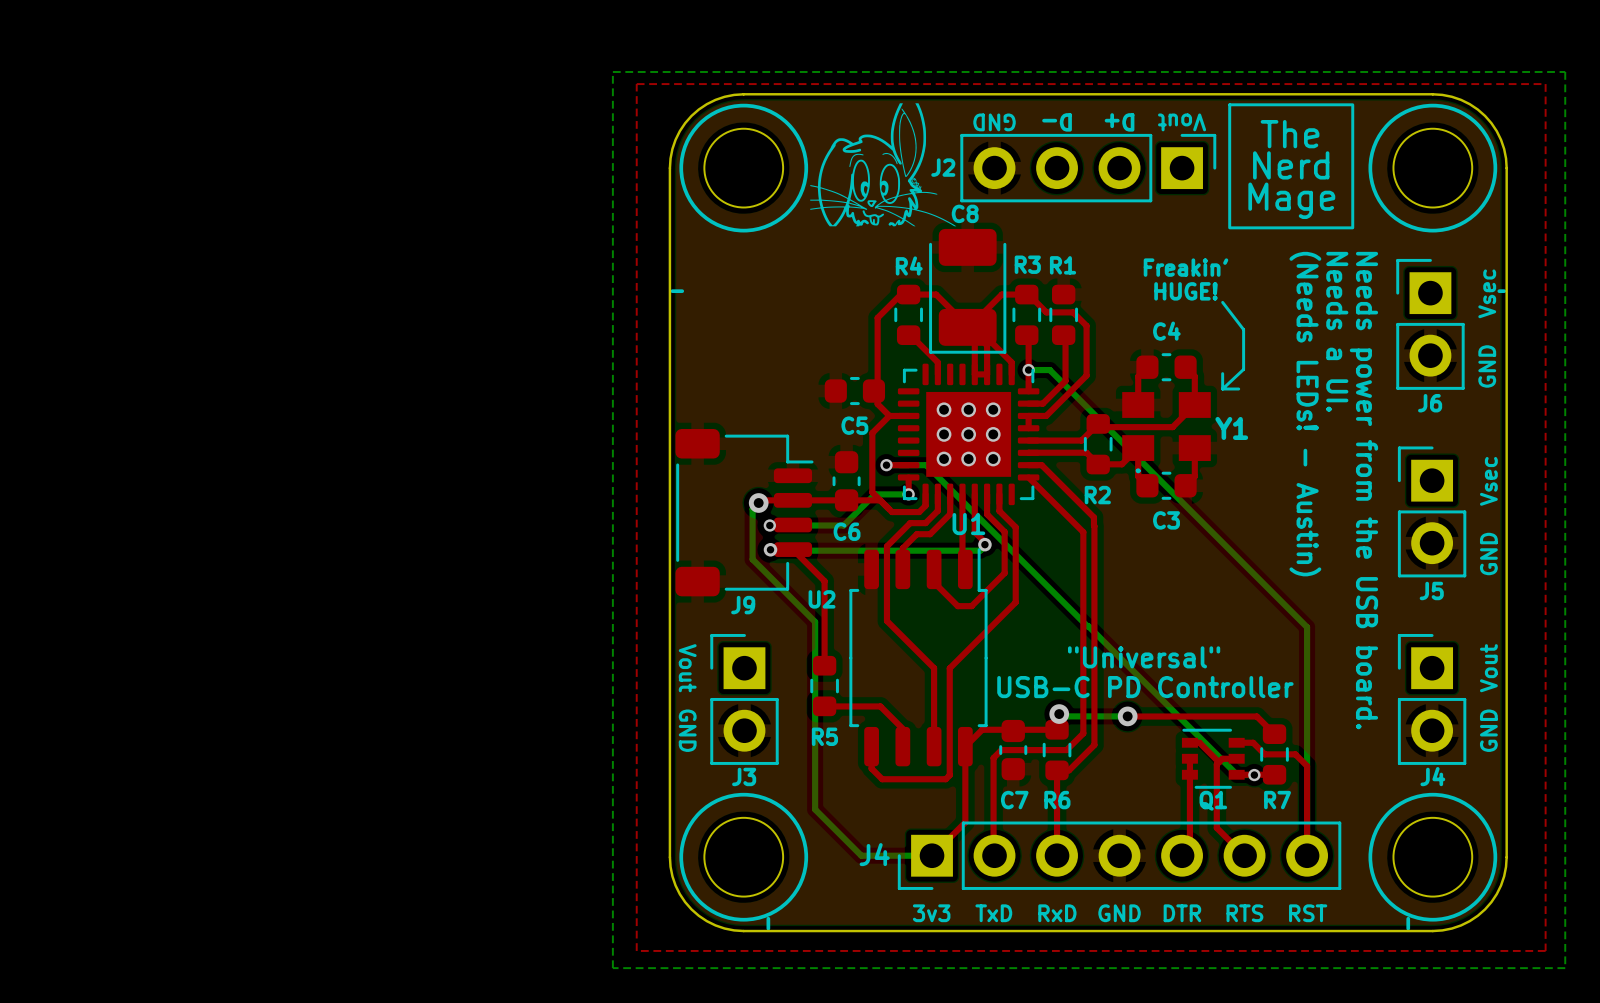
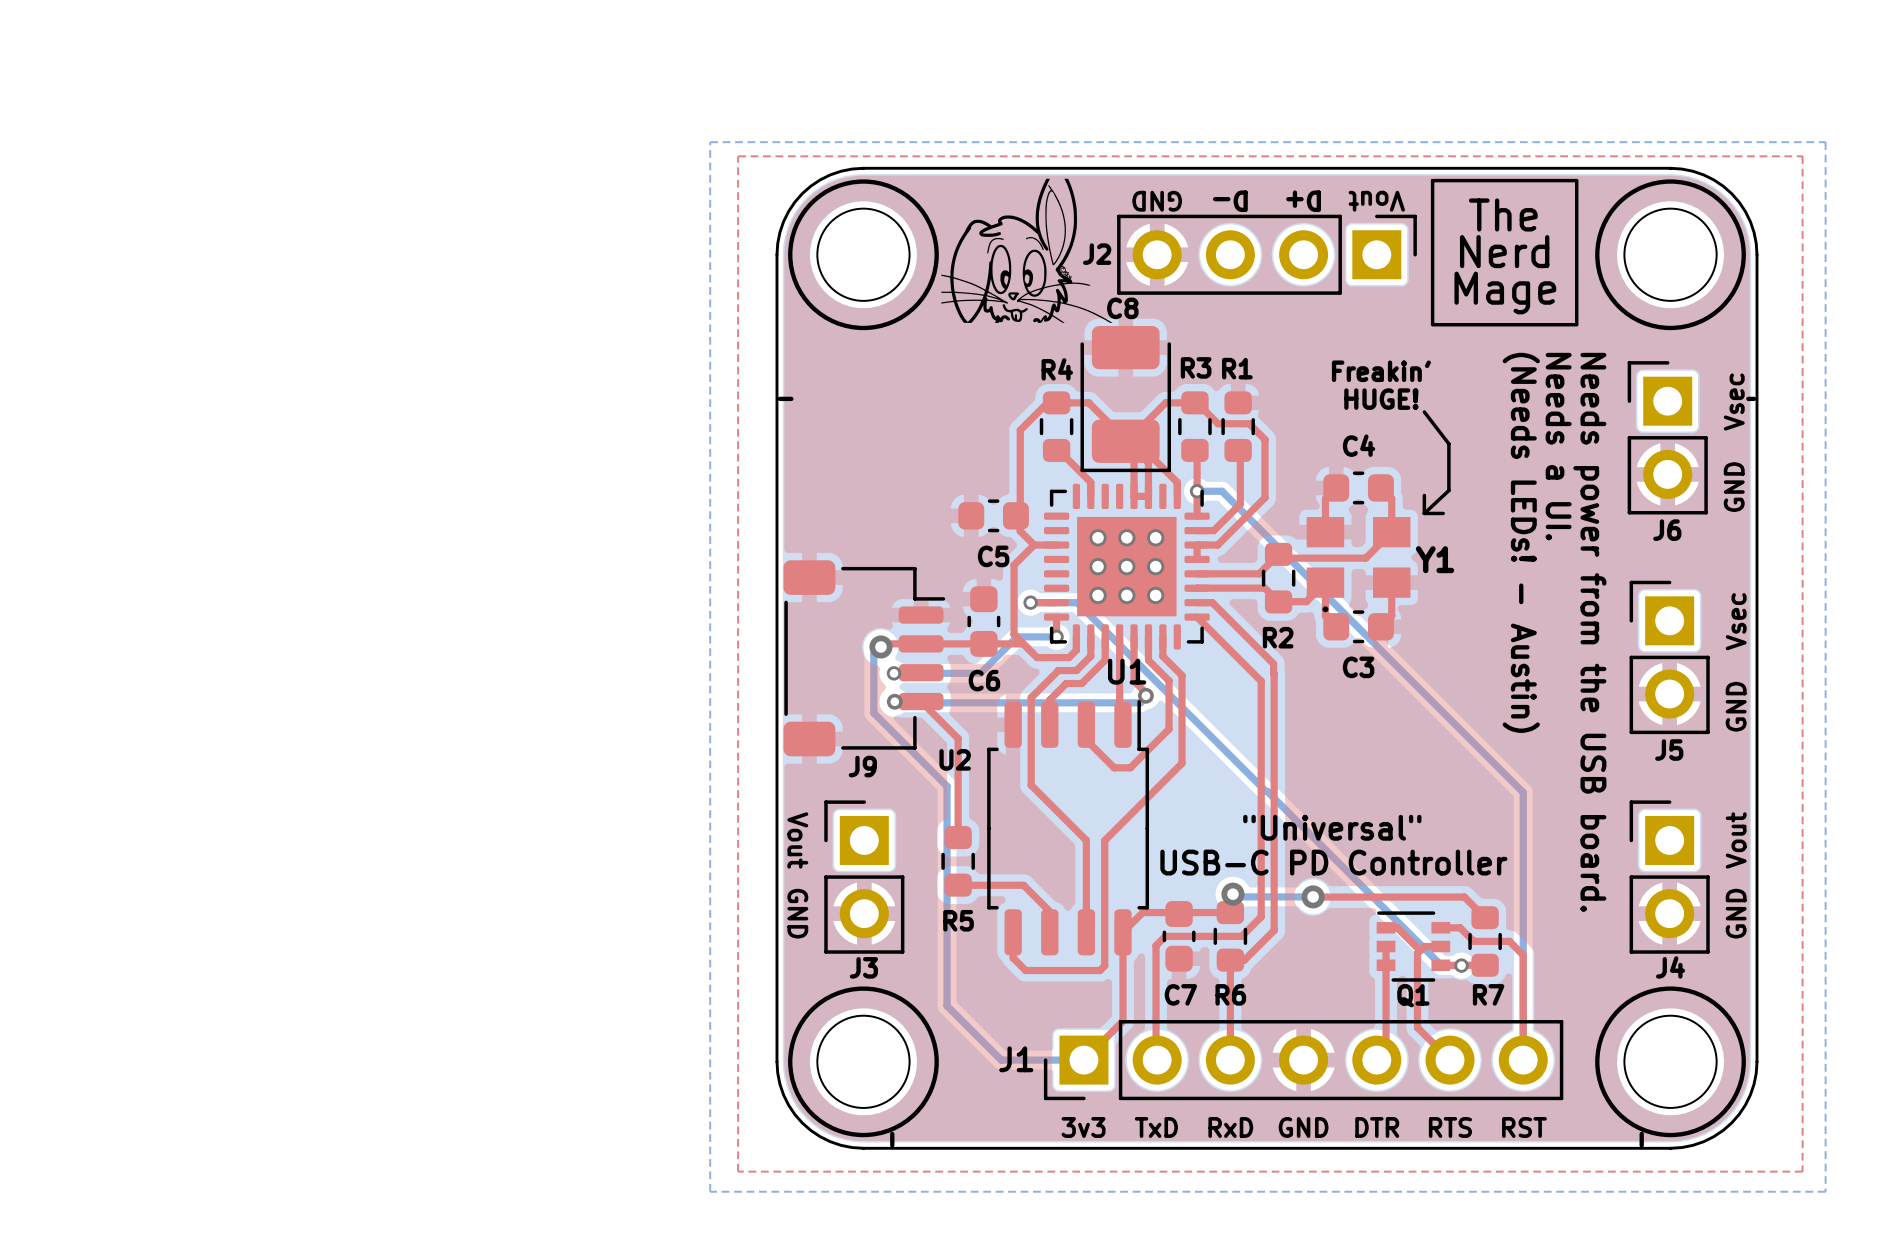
J4 name: J4 (874, 854) -> J1 (1016, 1059)

